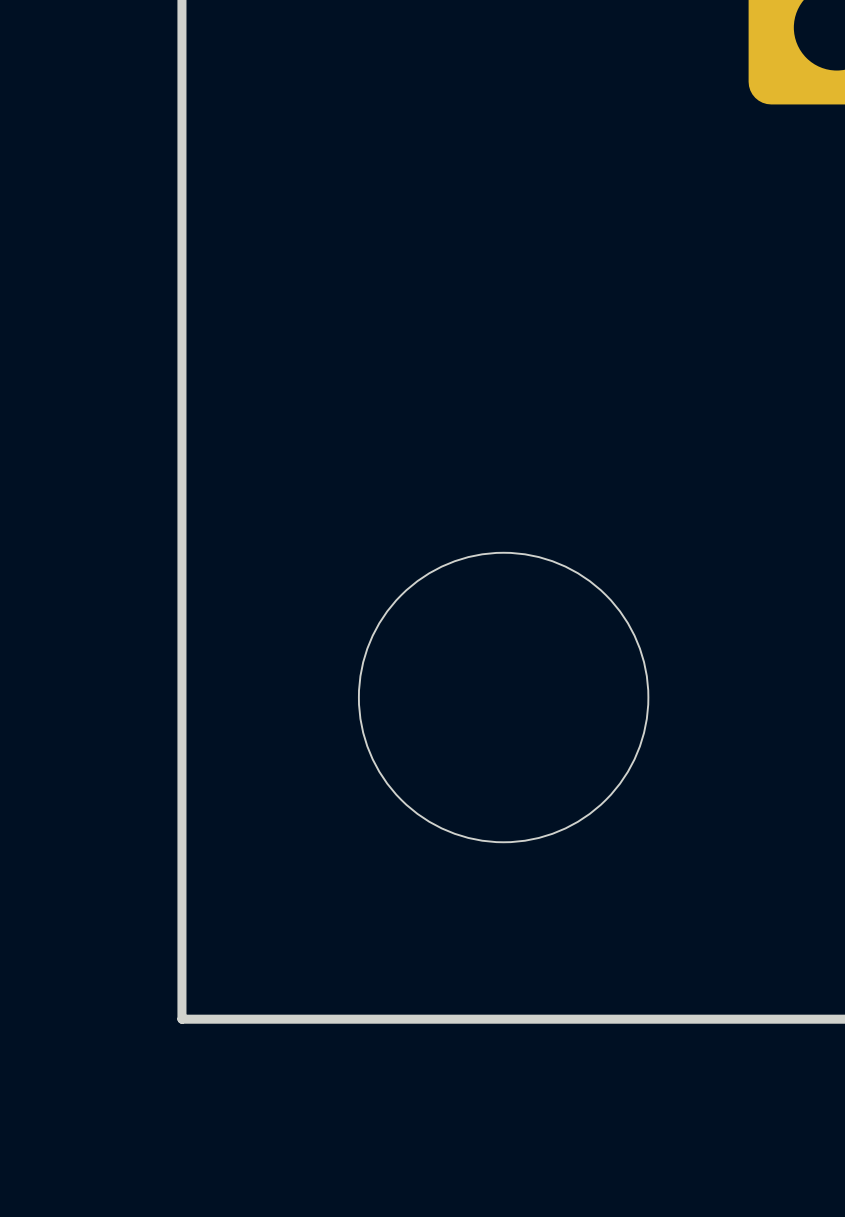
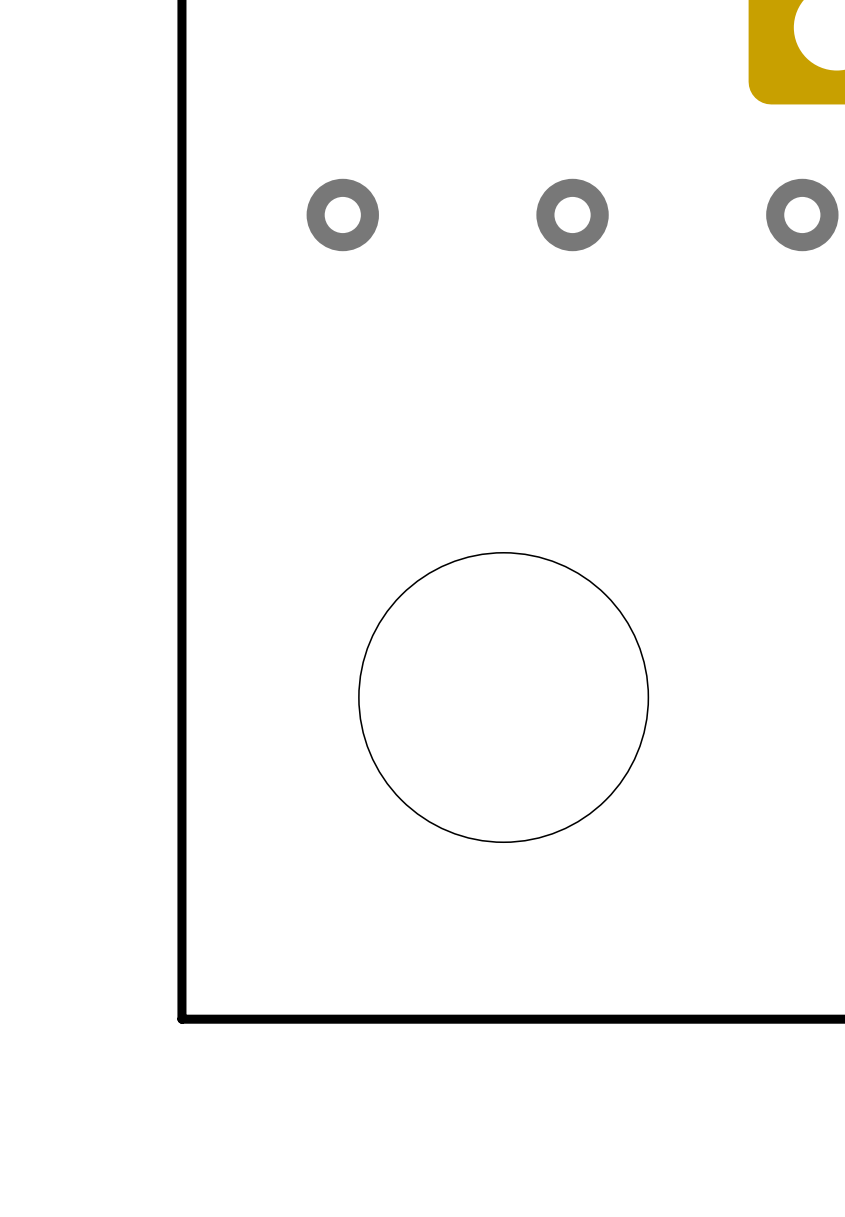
via: none -> (342, 214)
via: none -> (572, 214)
via: none -> (802, 214)

